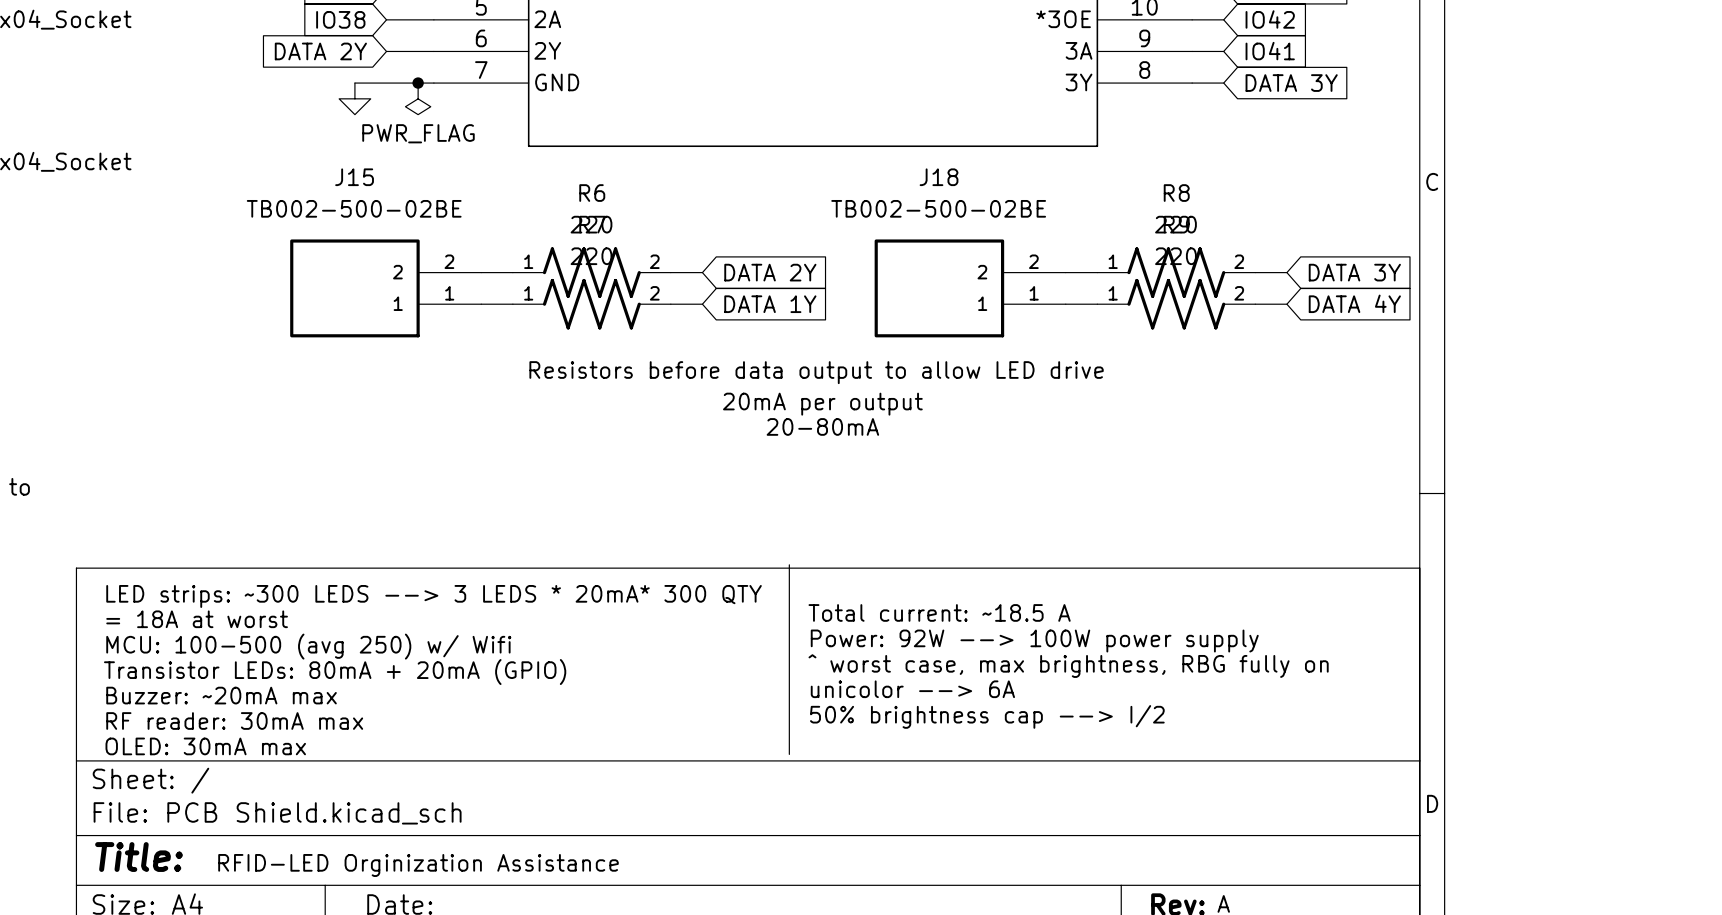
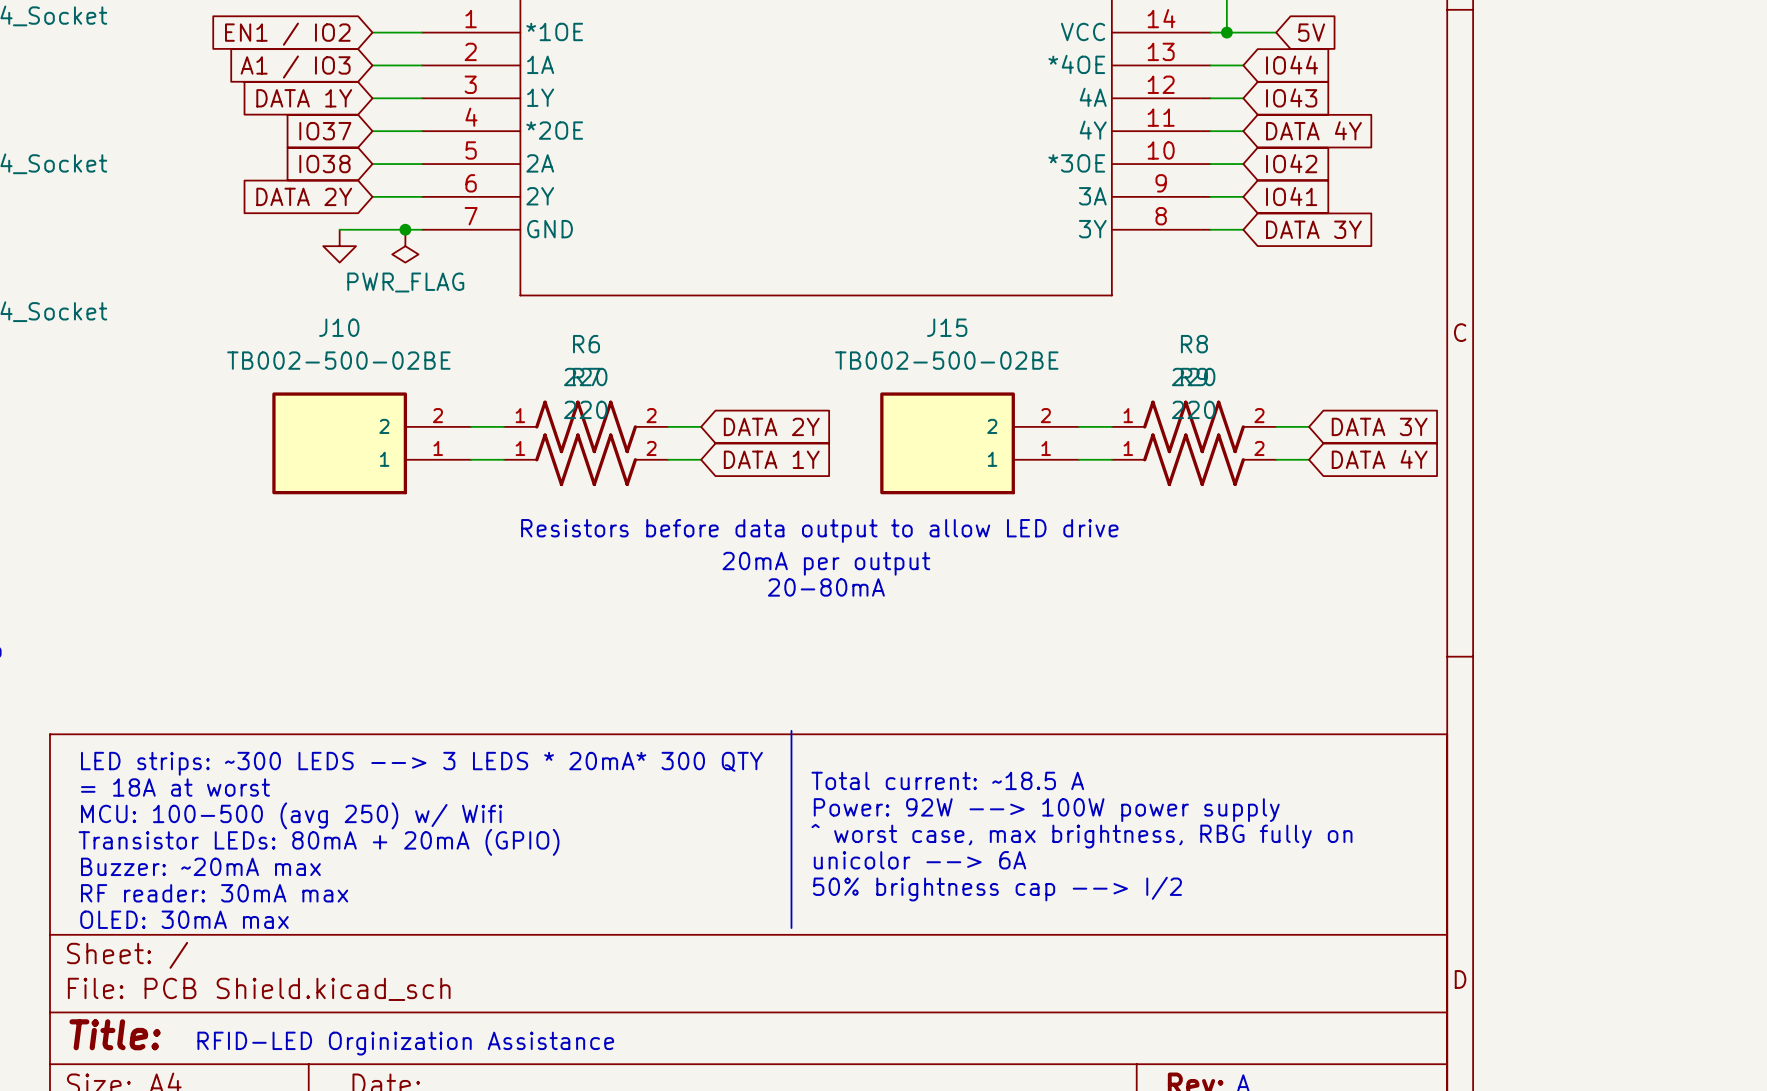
J15 name: J15 (354, 177) -> J10 (339, 327)
J18 name: J18 (939, 177) -> J15 (947, 327)

